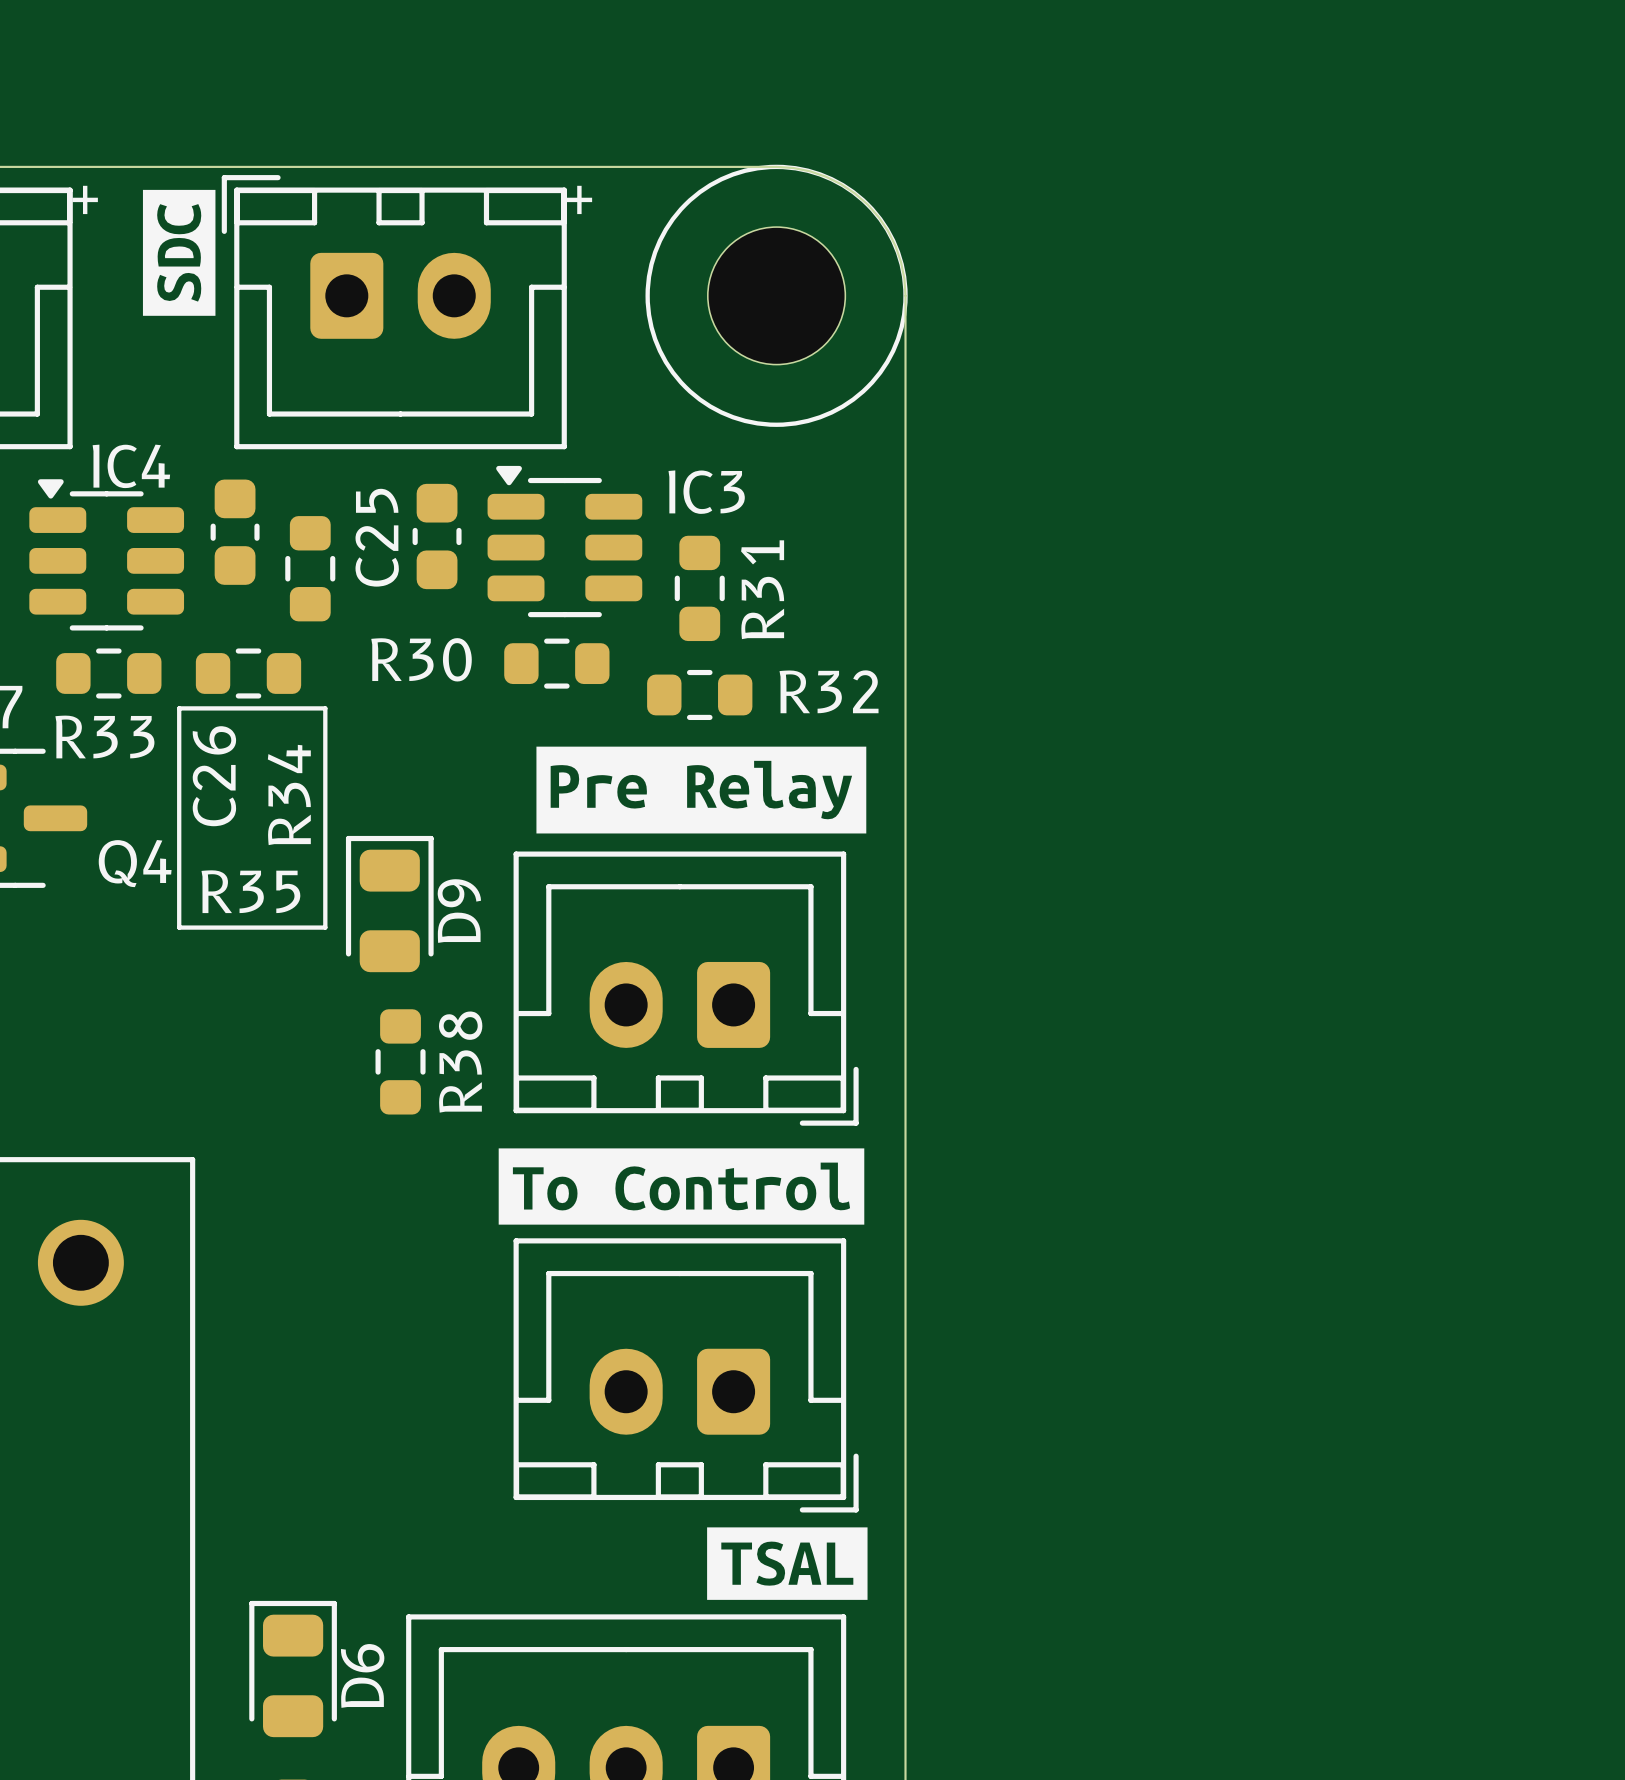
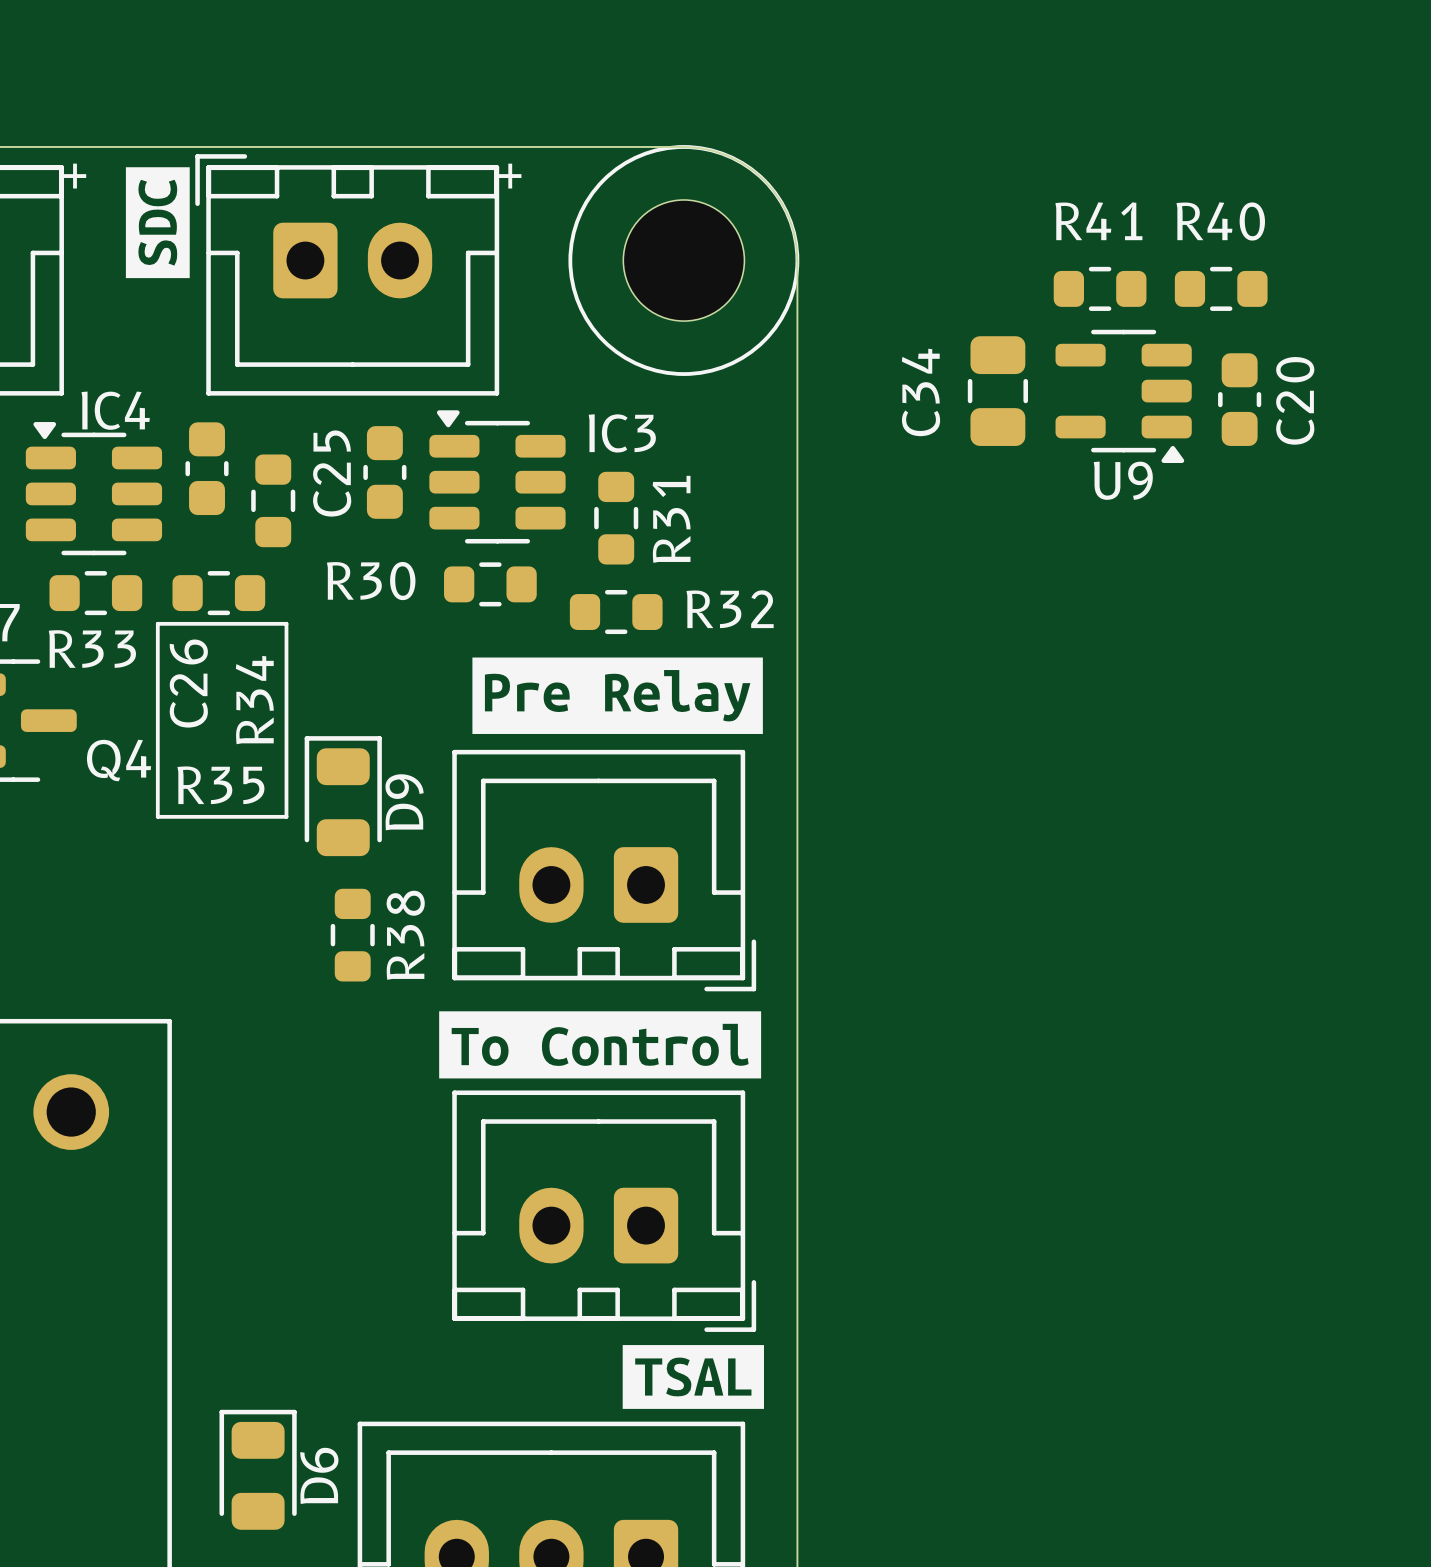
R41: none -> (1100, 288)
R40: none -> (1221, 288)
C34: none -> (997, 391)
U9: none -> (1123, 396)
C20: none -> (1239, 399)

